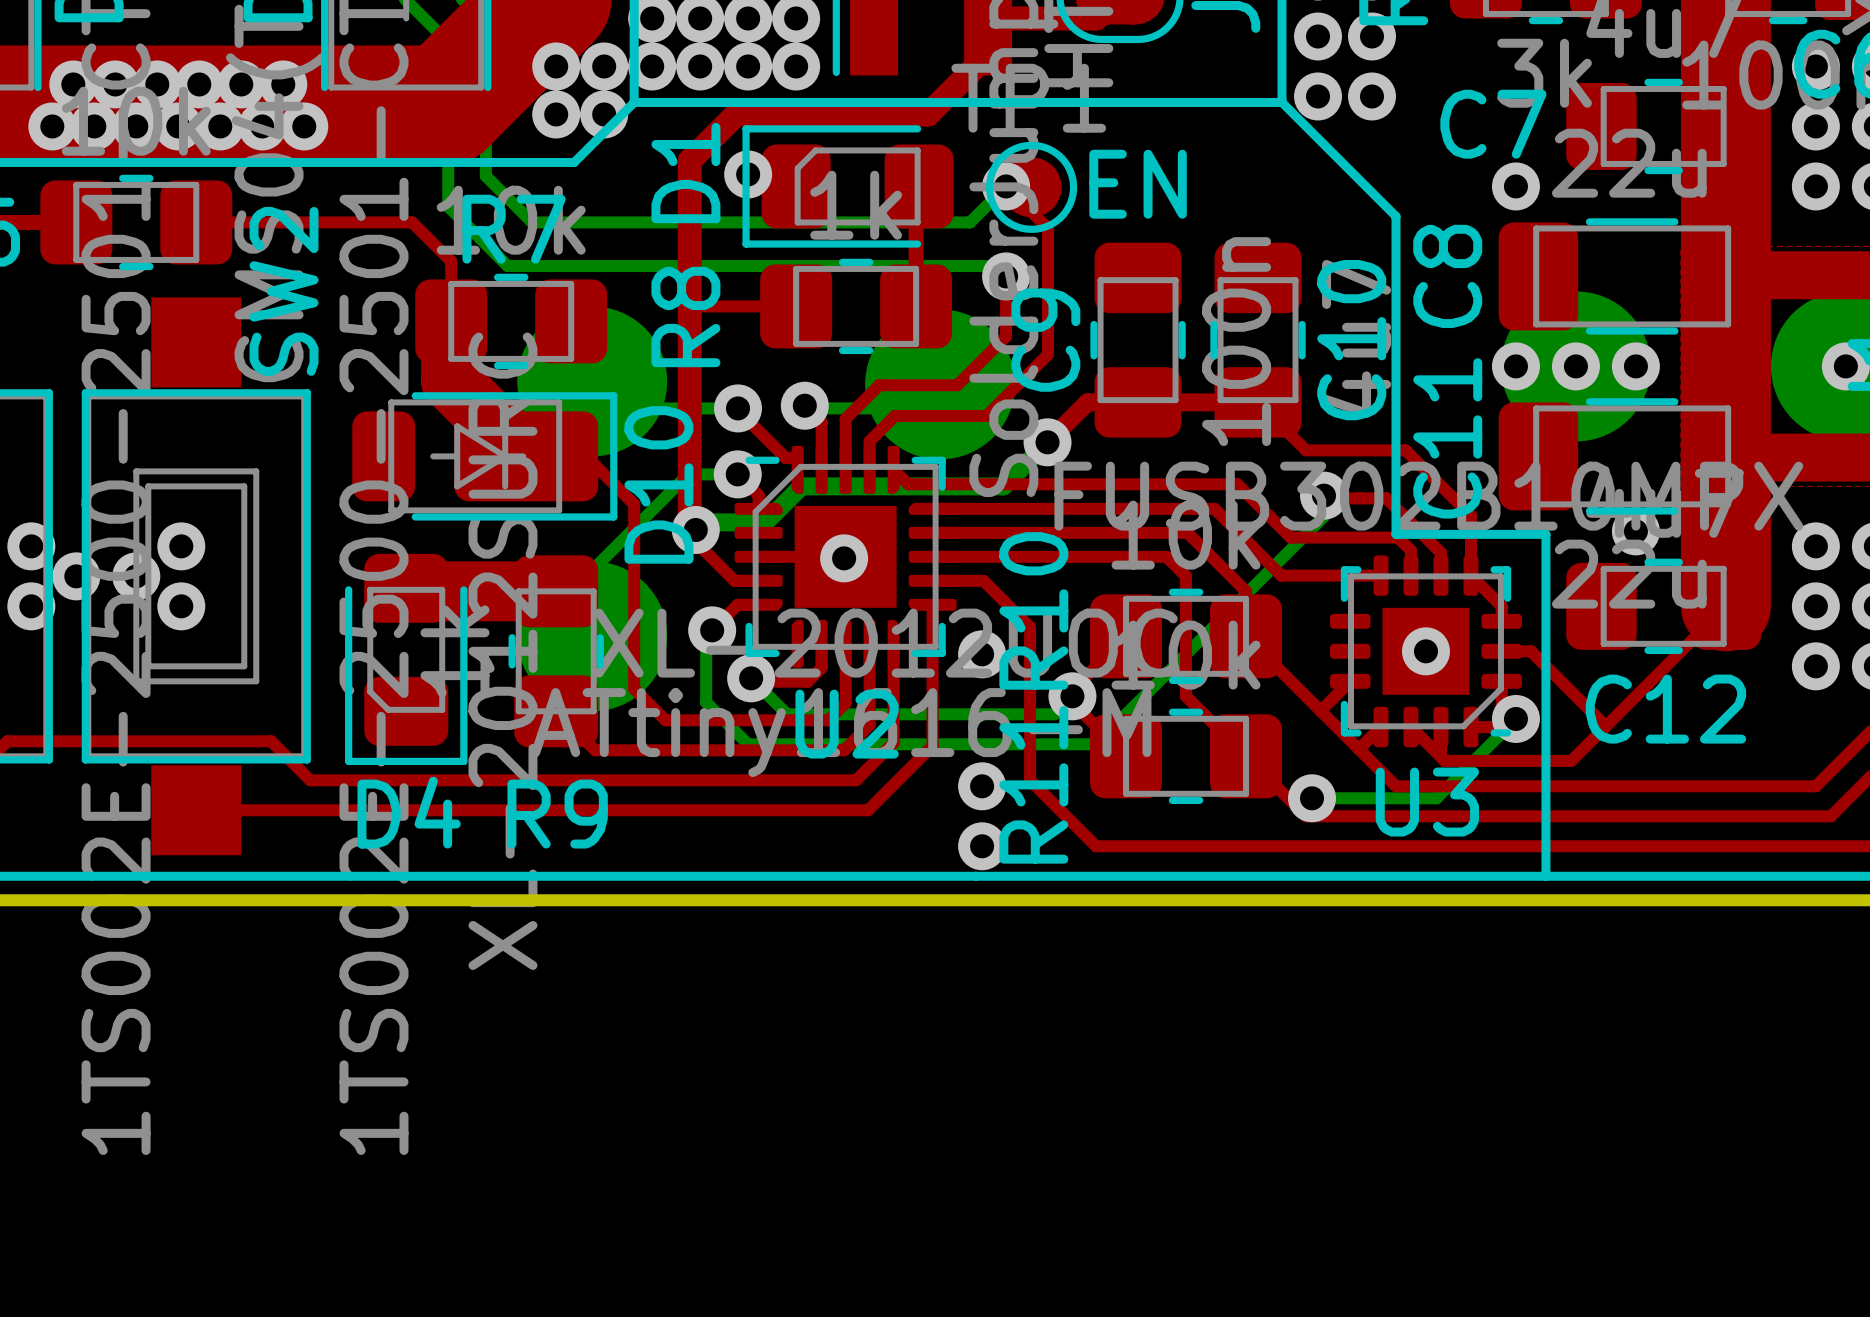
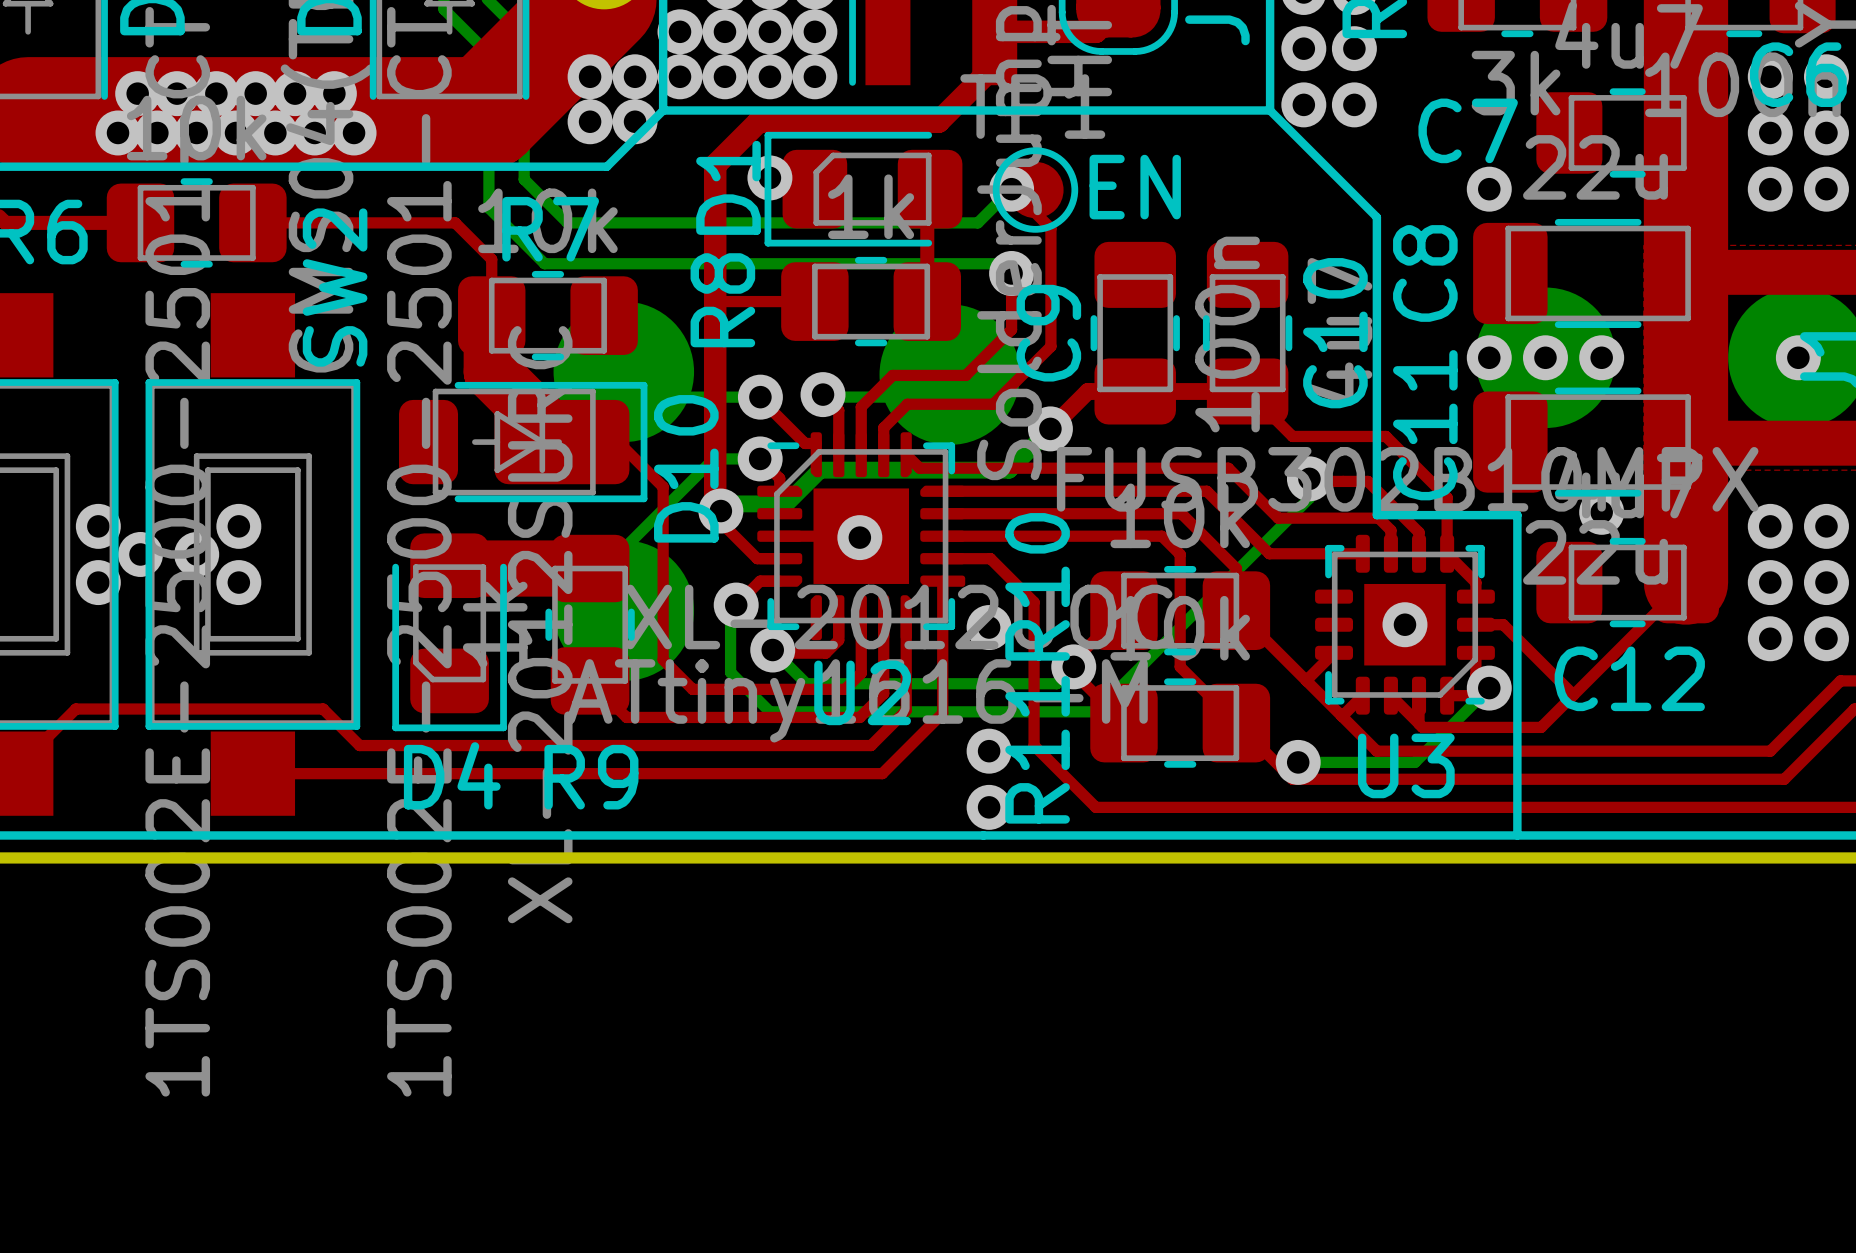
D1 name position: D1 (685, 173) -> D1 (728, 187)
R8 name position: R8 (685, 316) -> R8 (722, 300)

